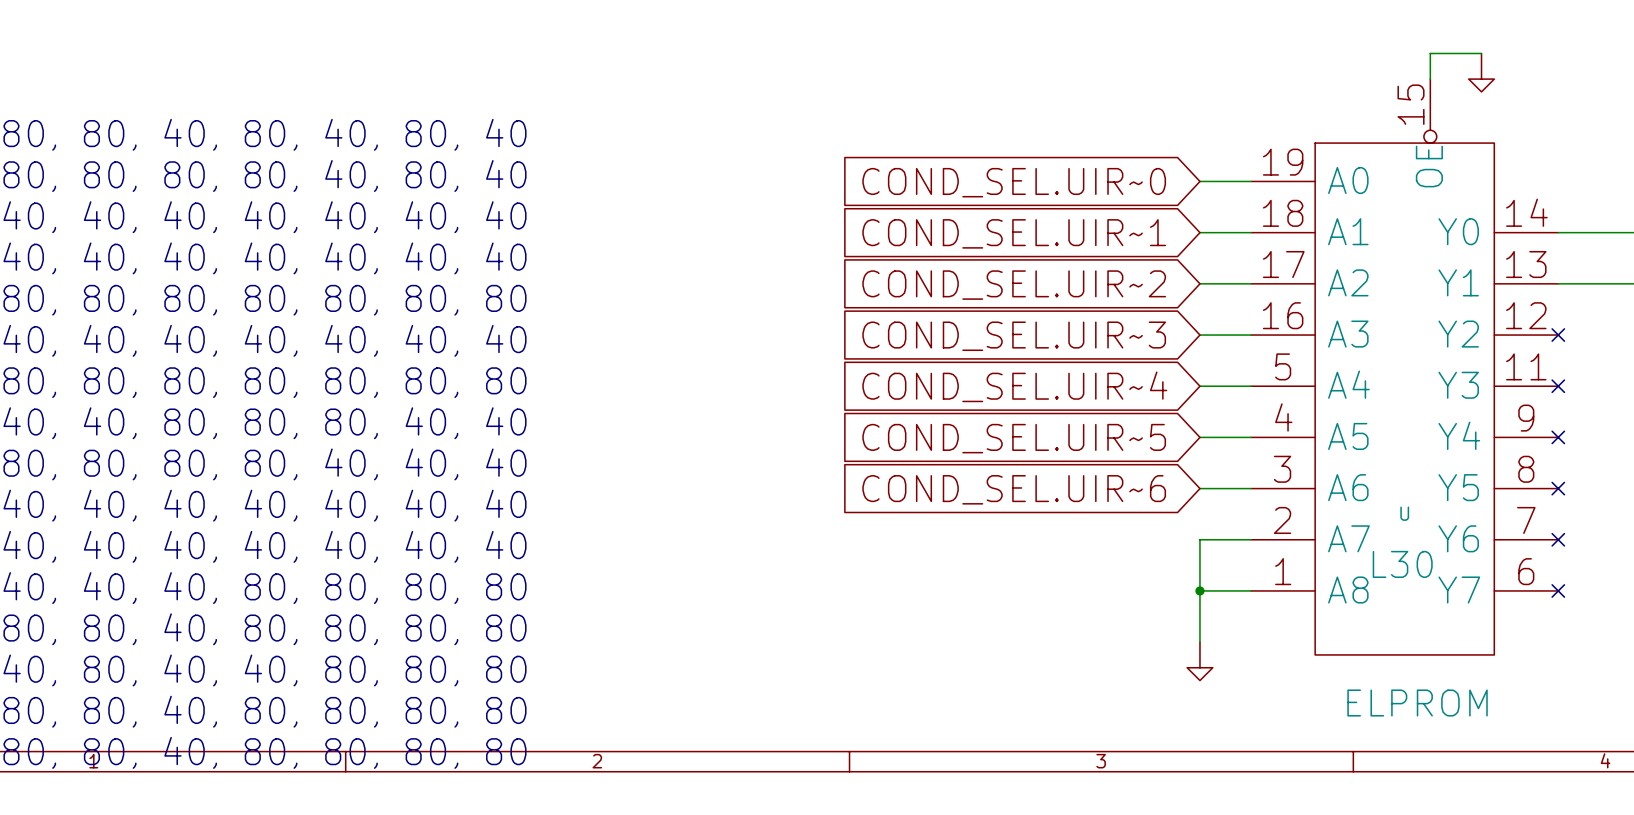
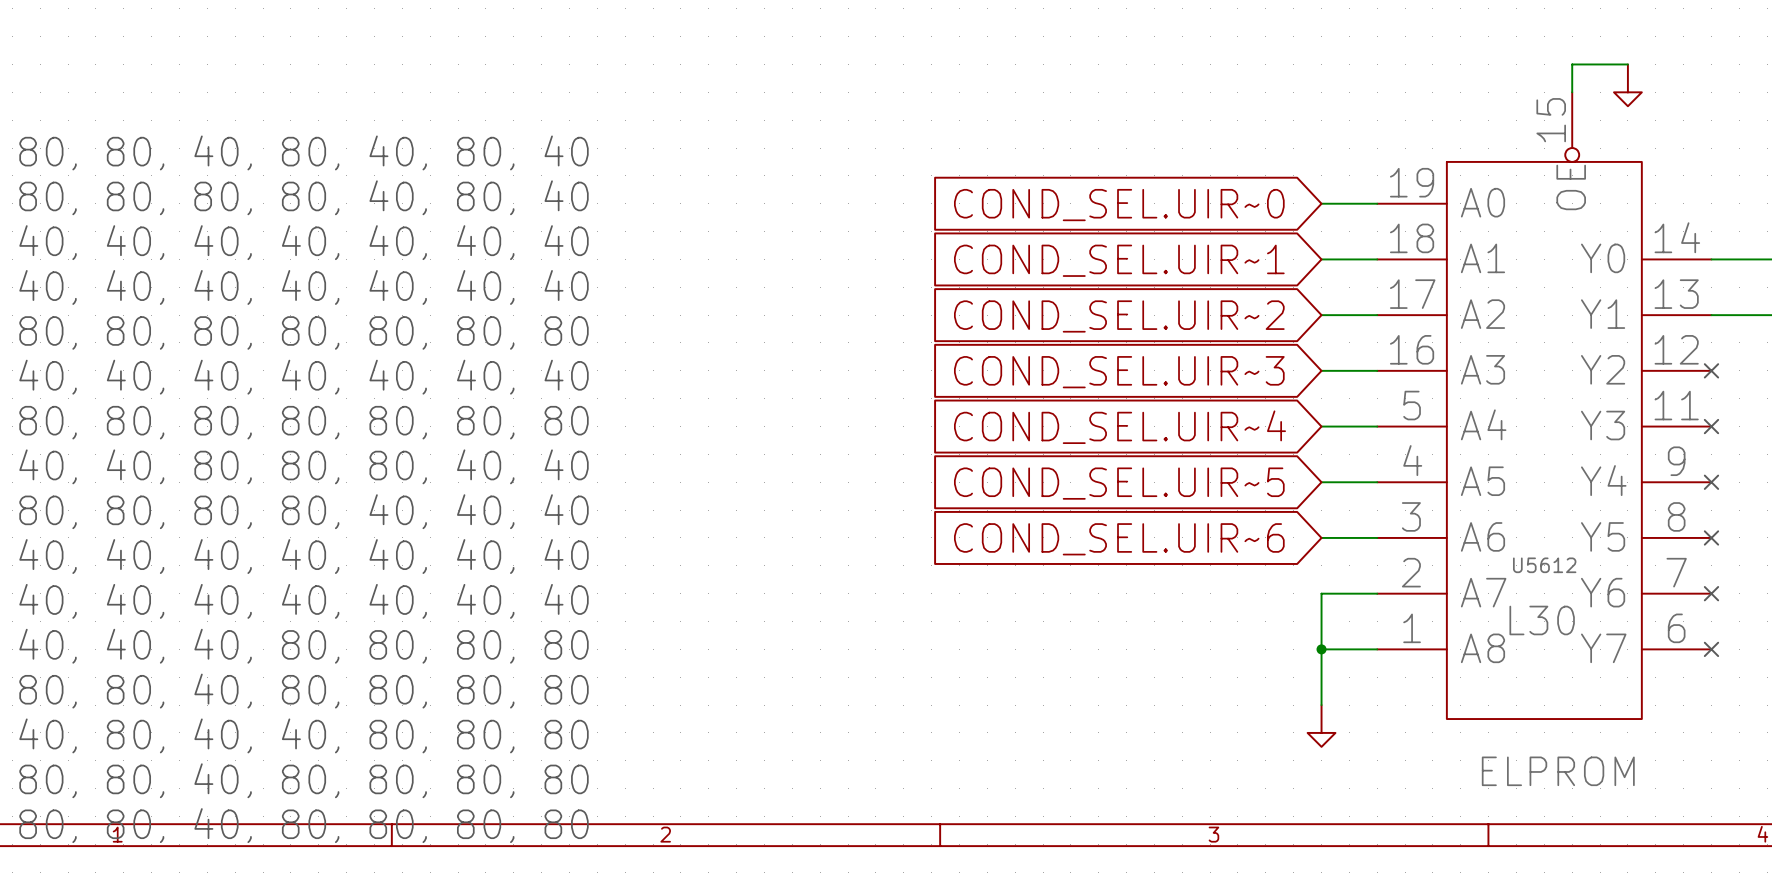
U name: U (1404, 513) -> U5612 (1544, 565)

